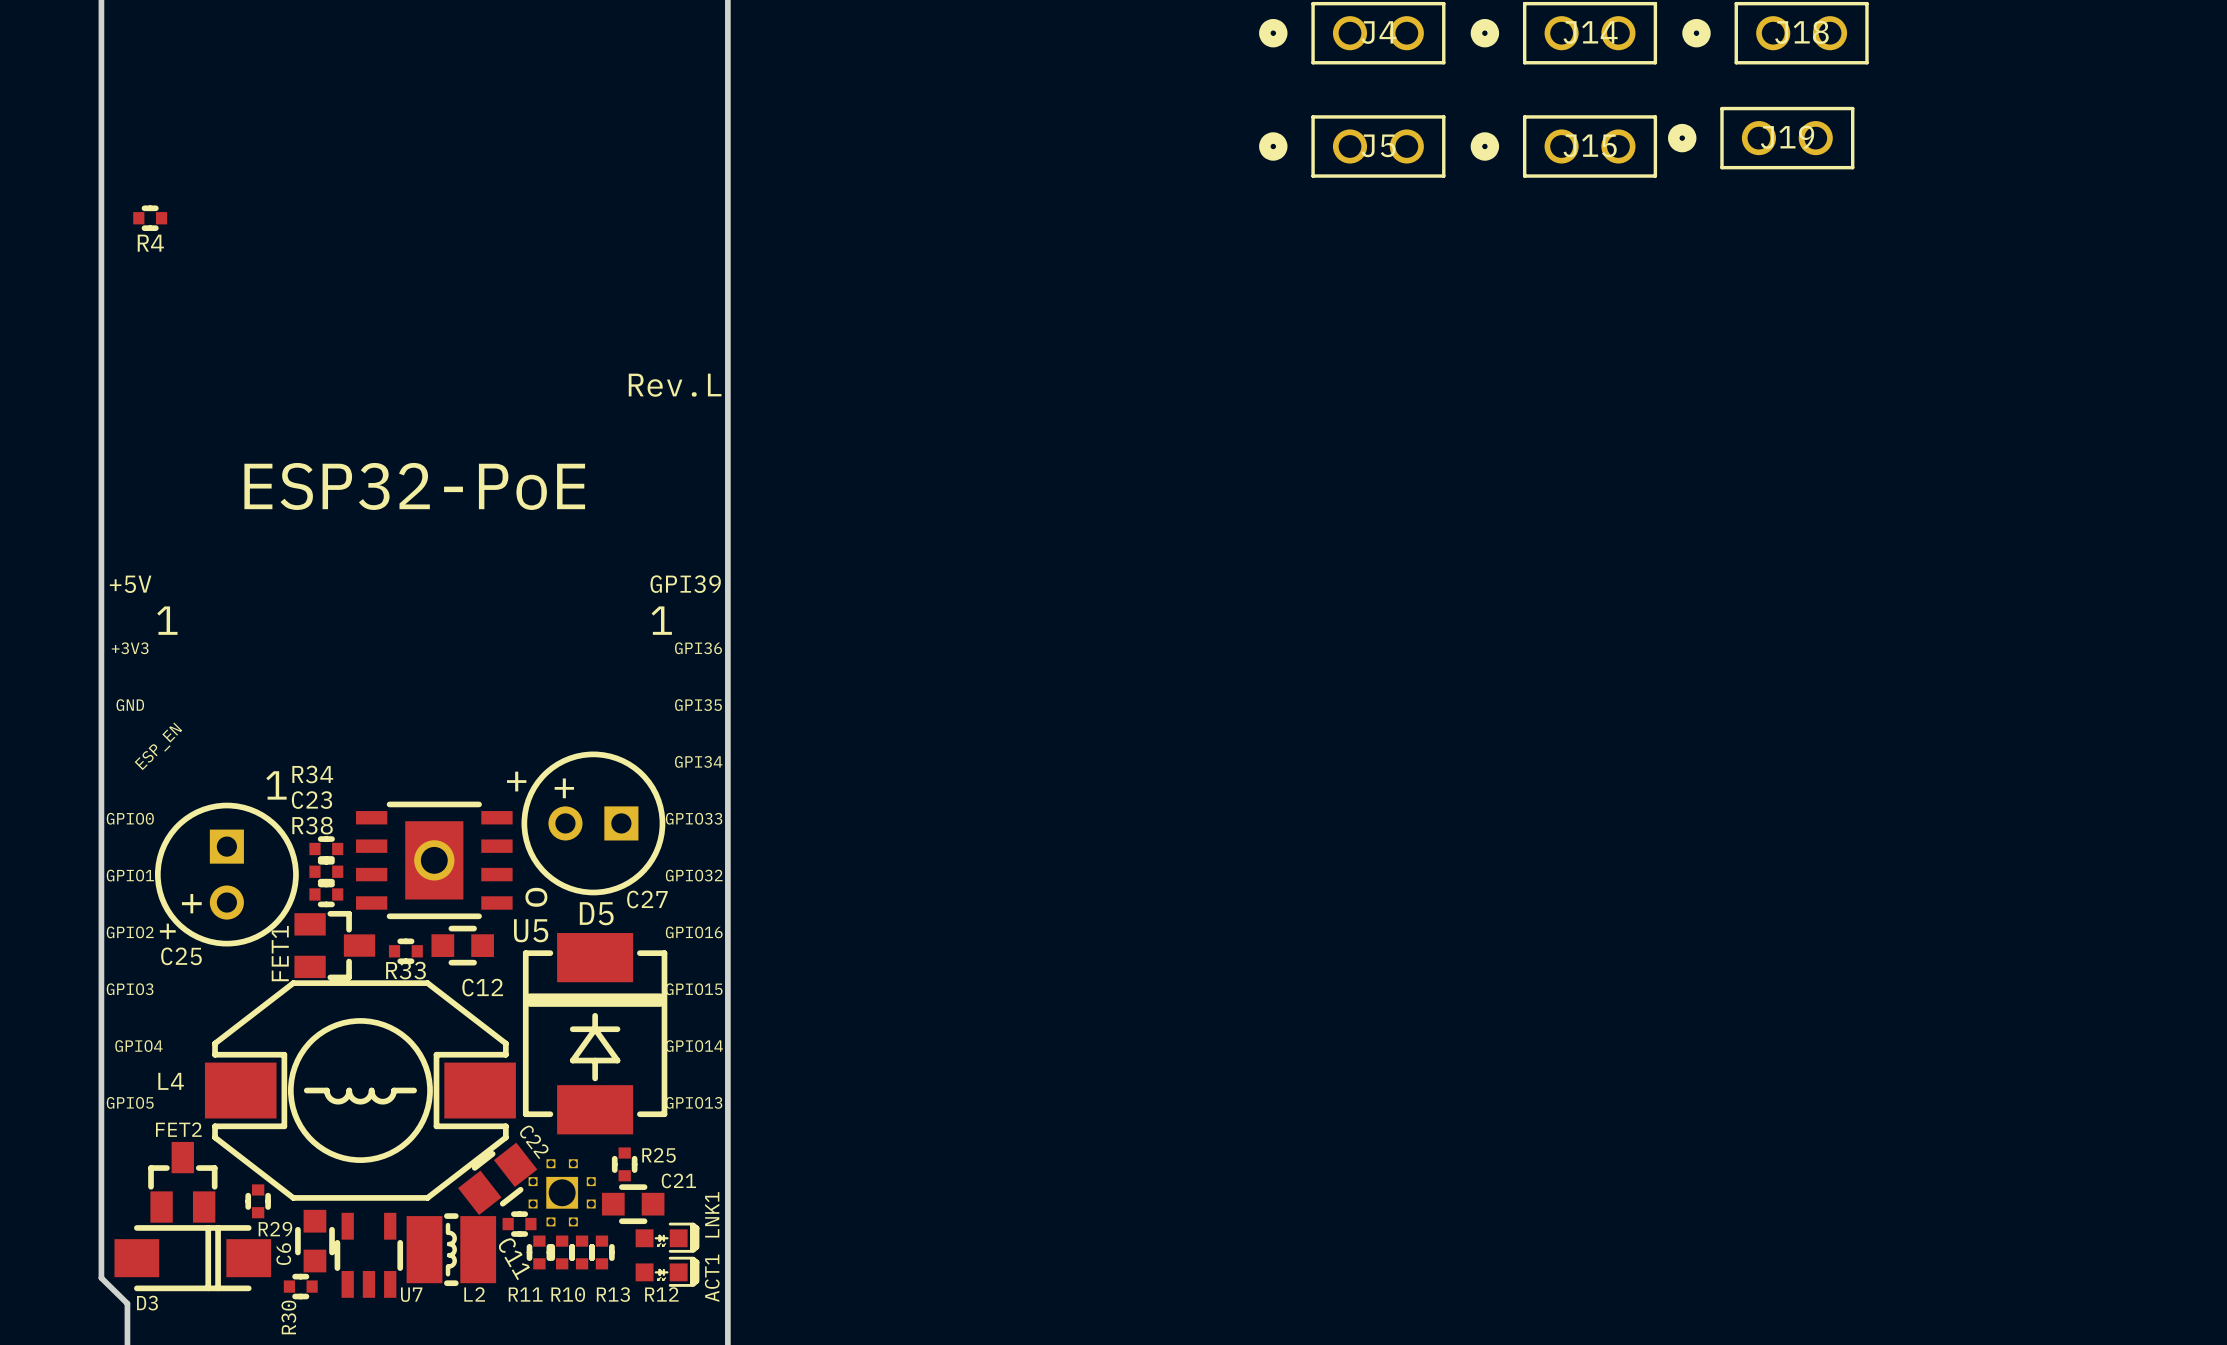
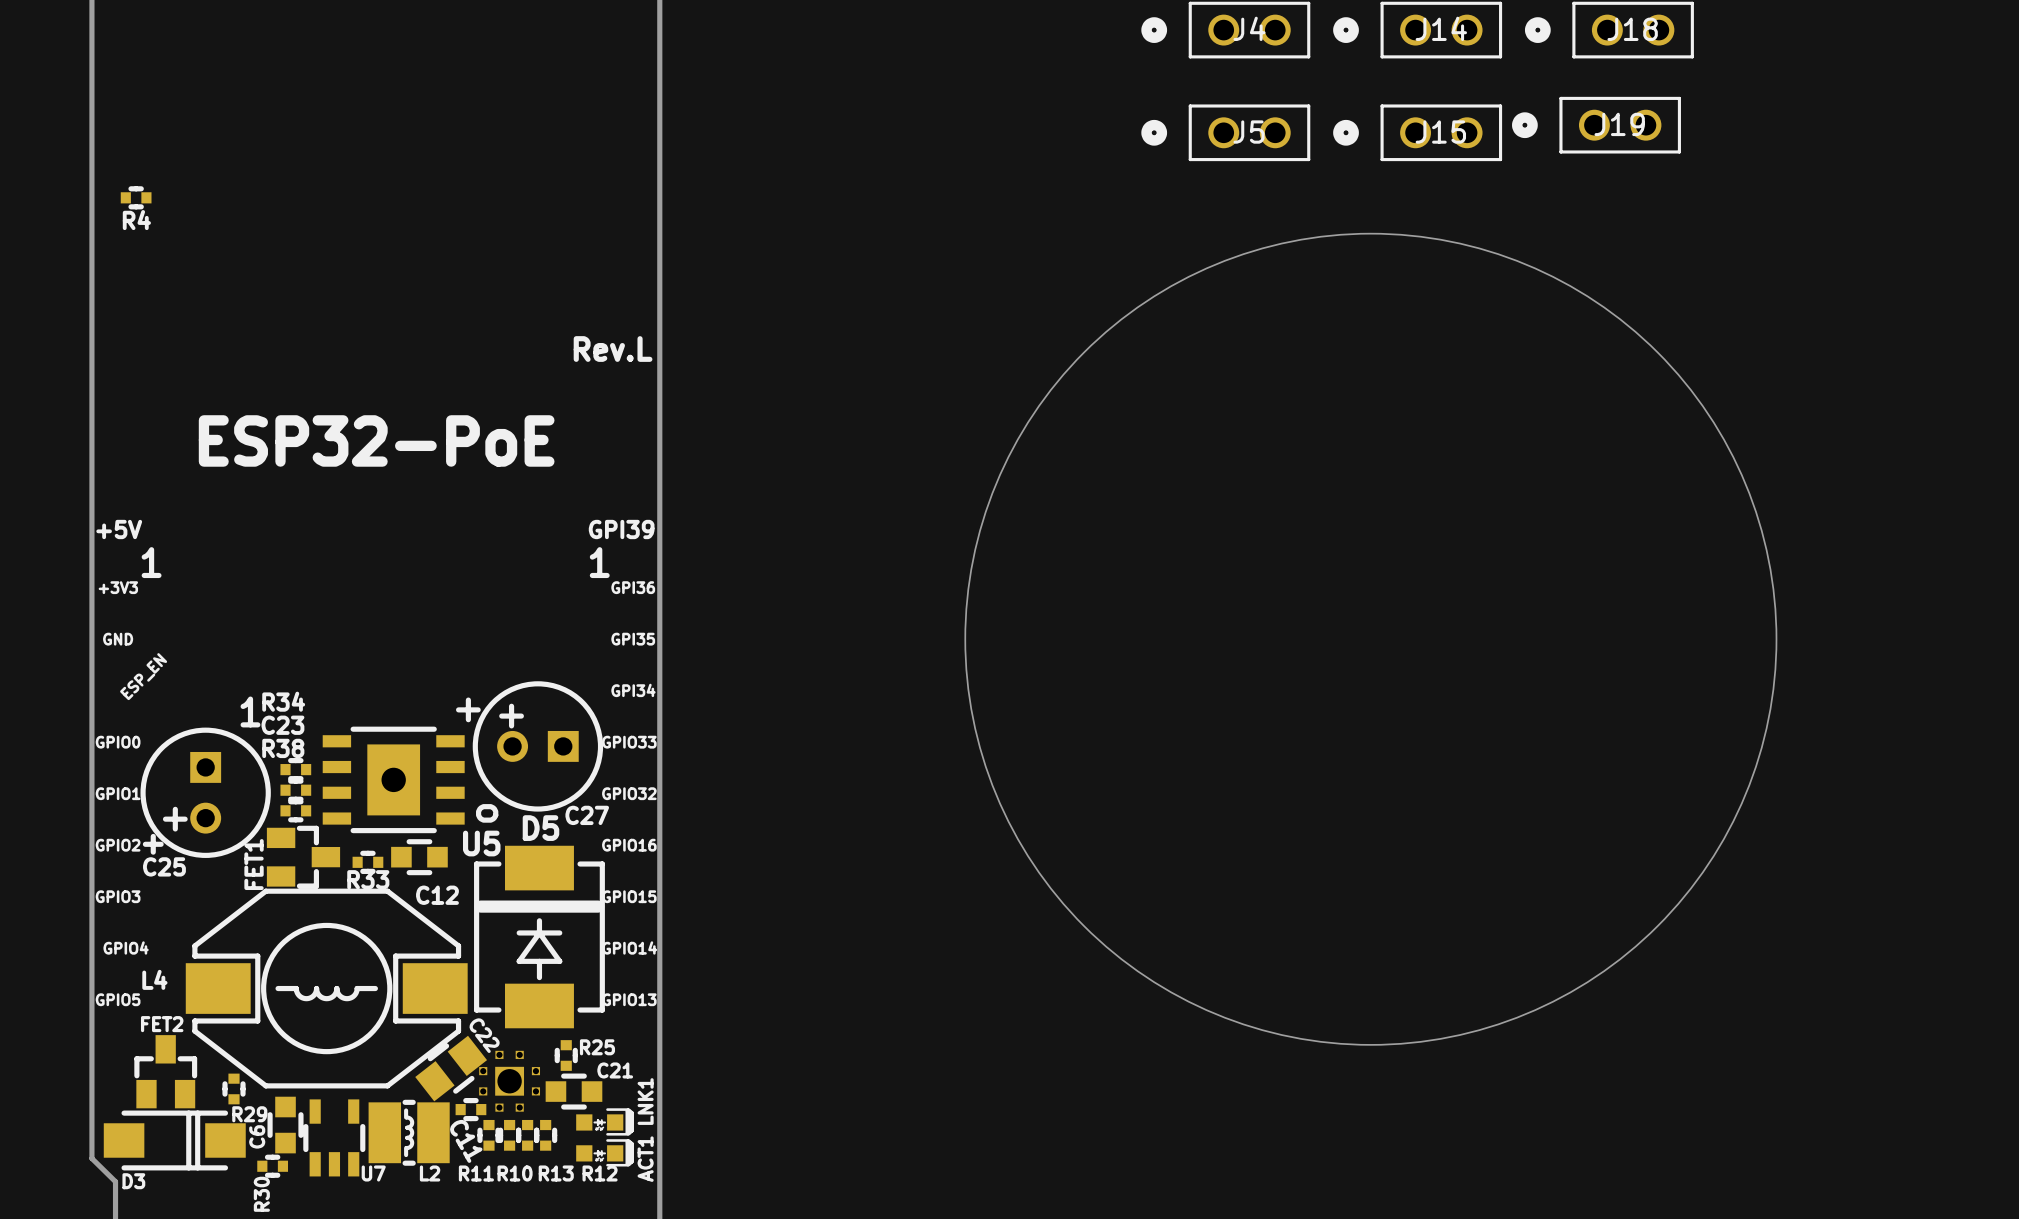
round board edge: none -> [964, 233, 1777, 1046]

